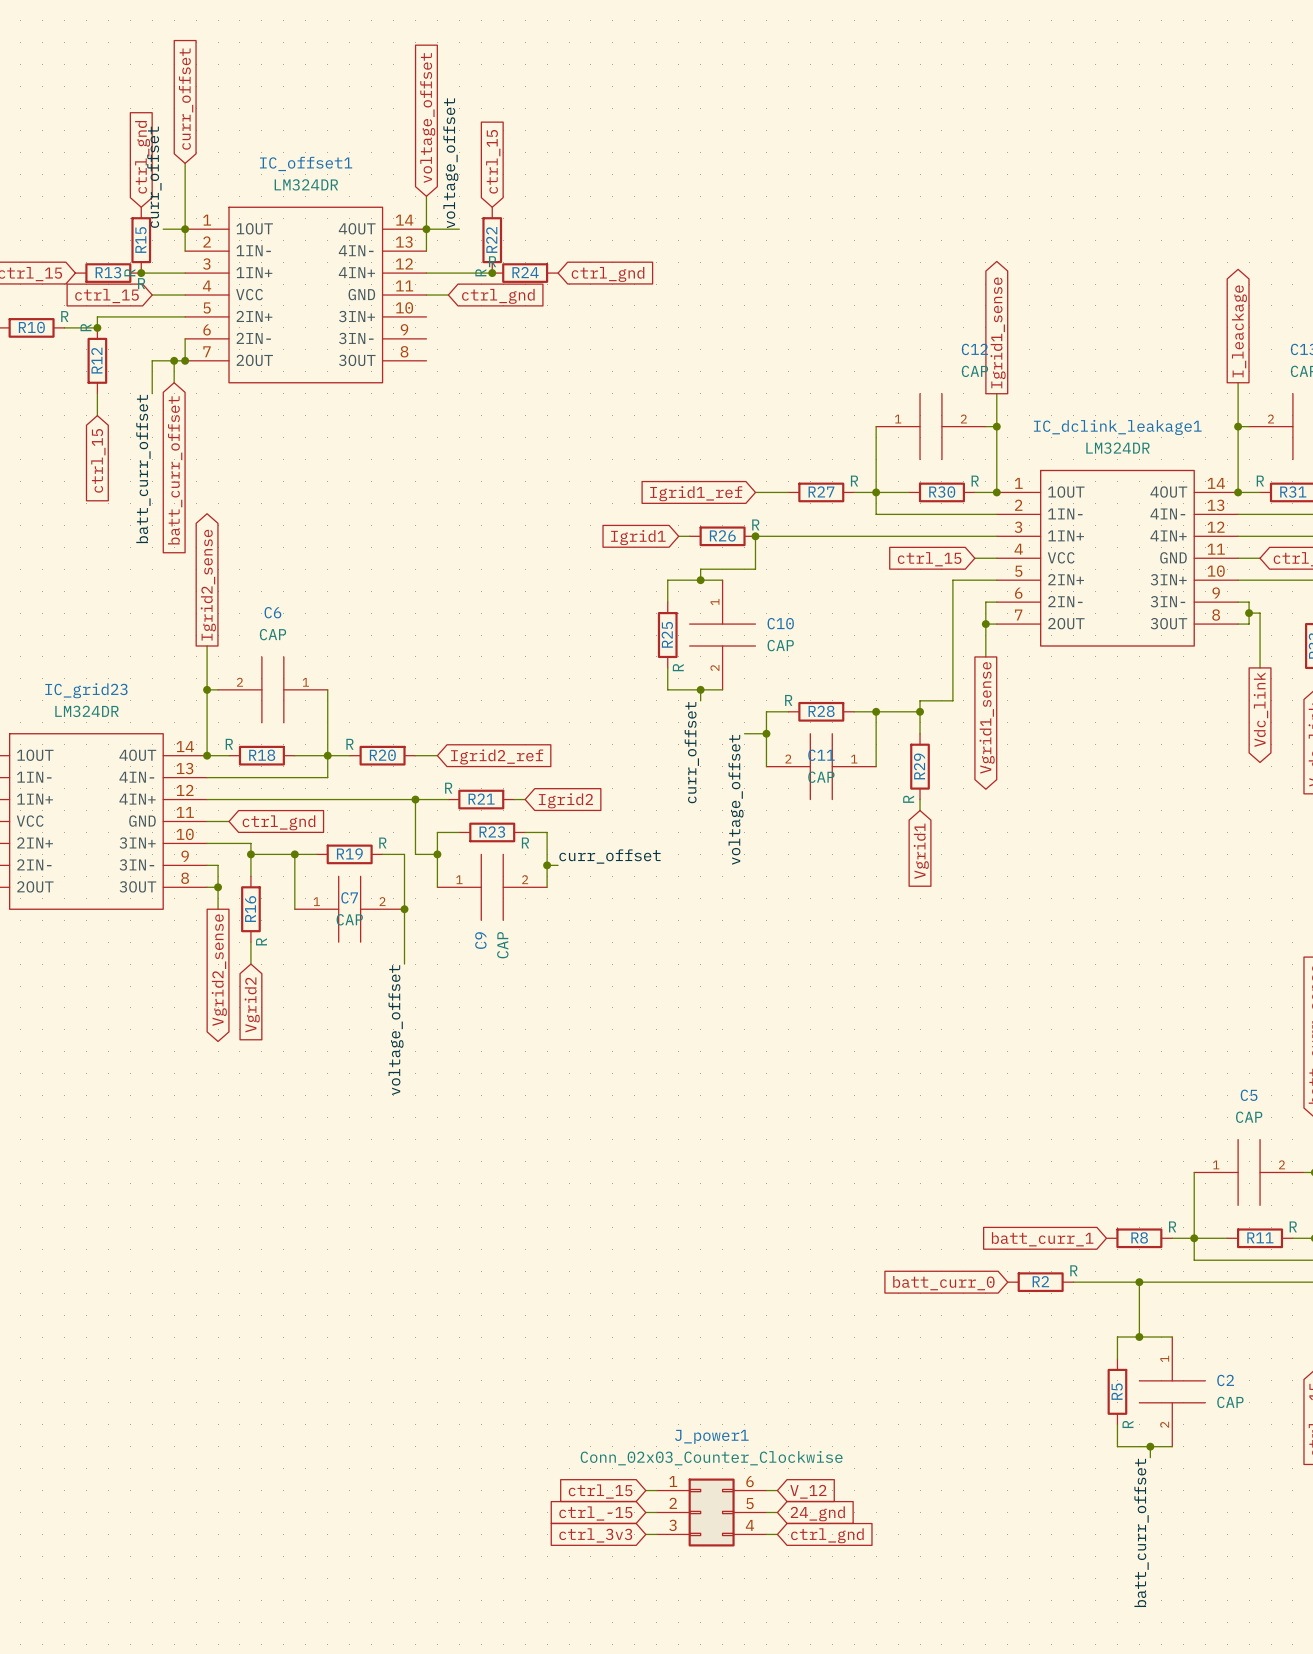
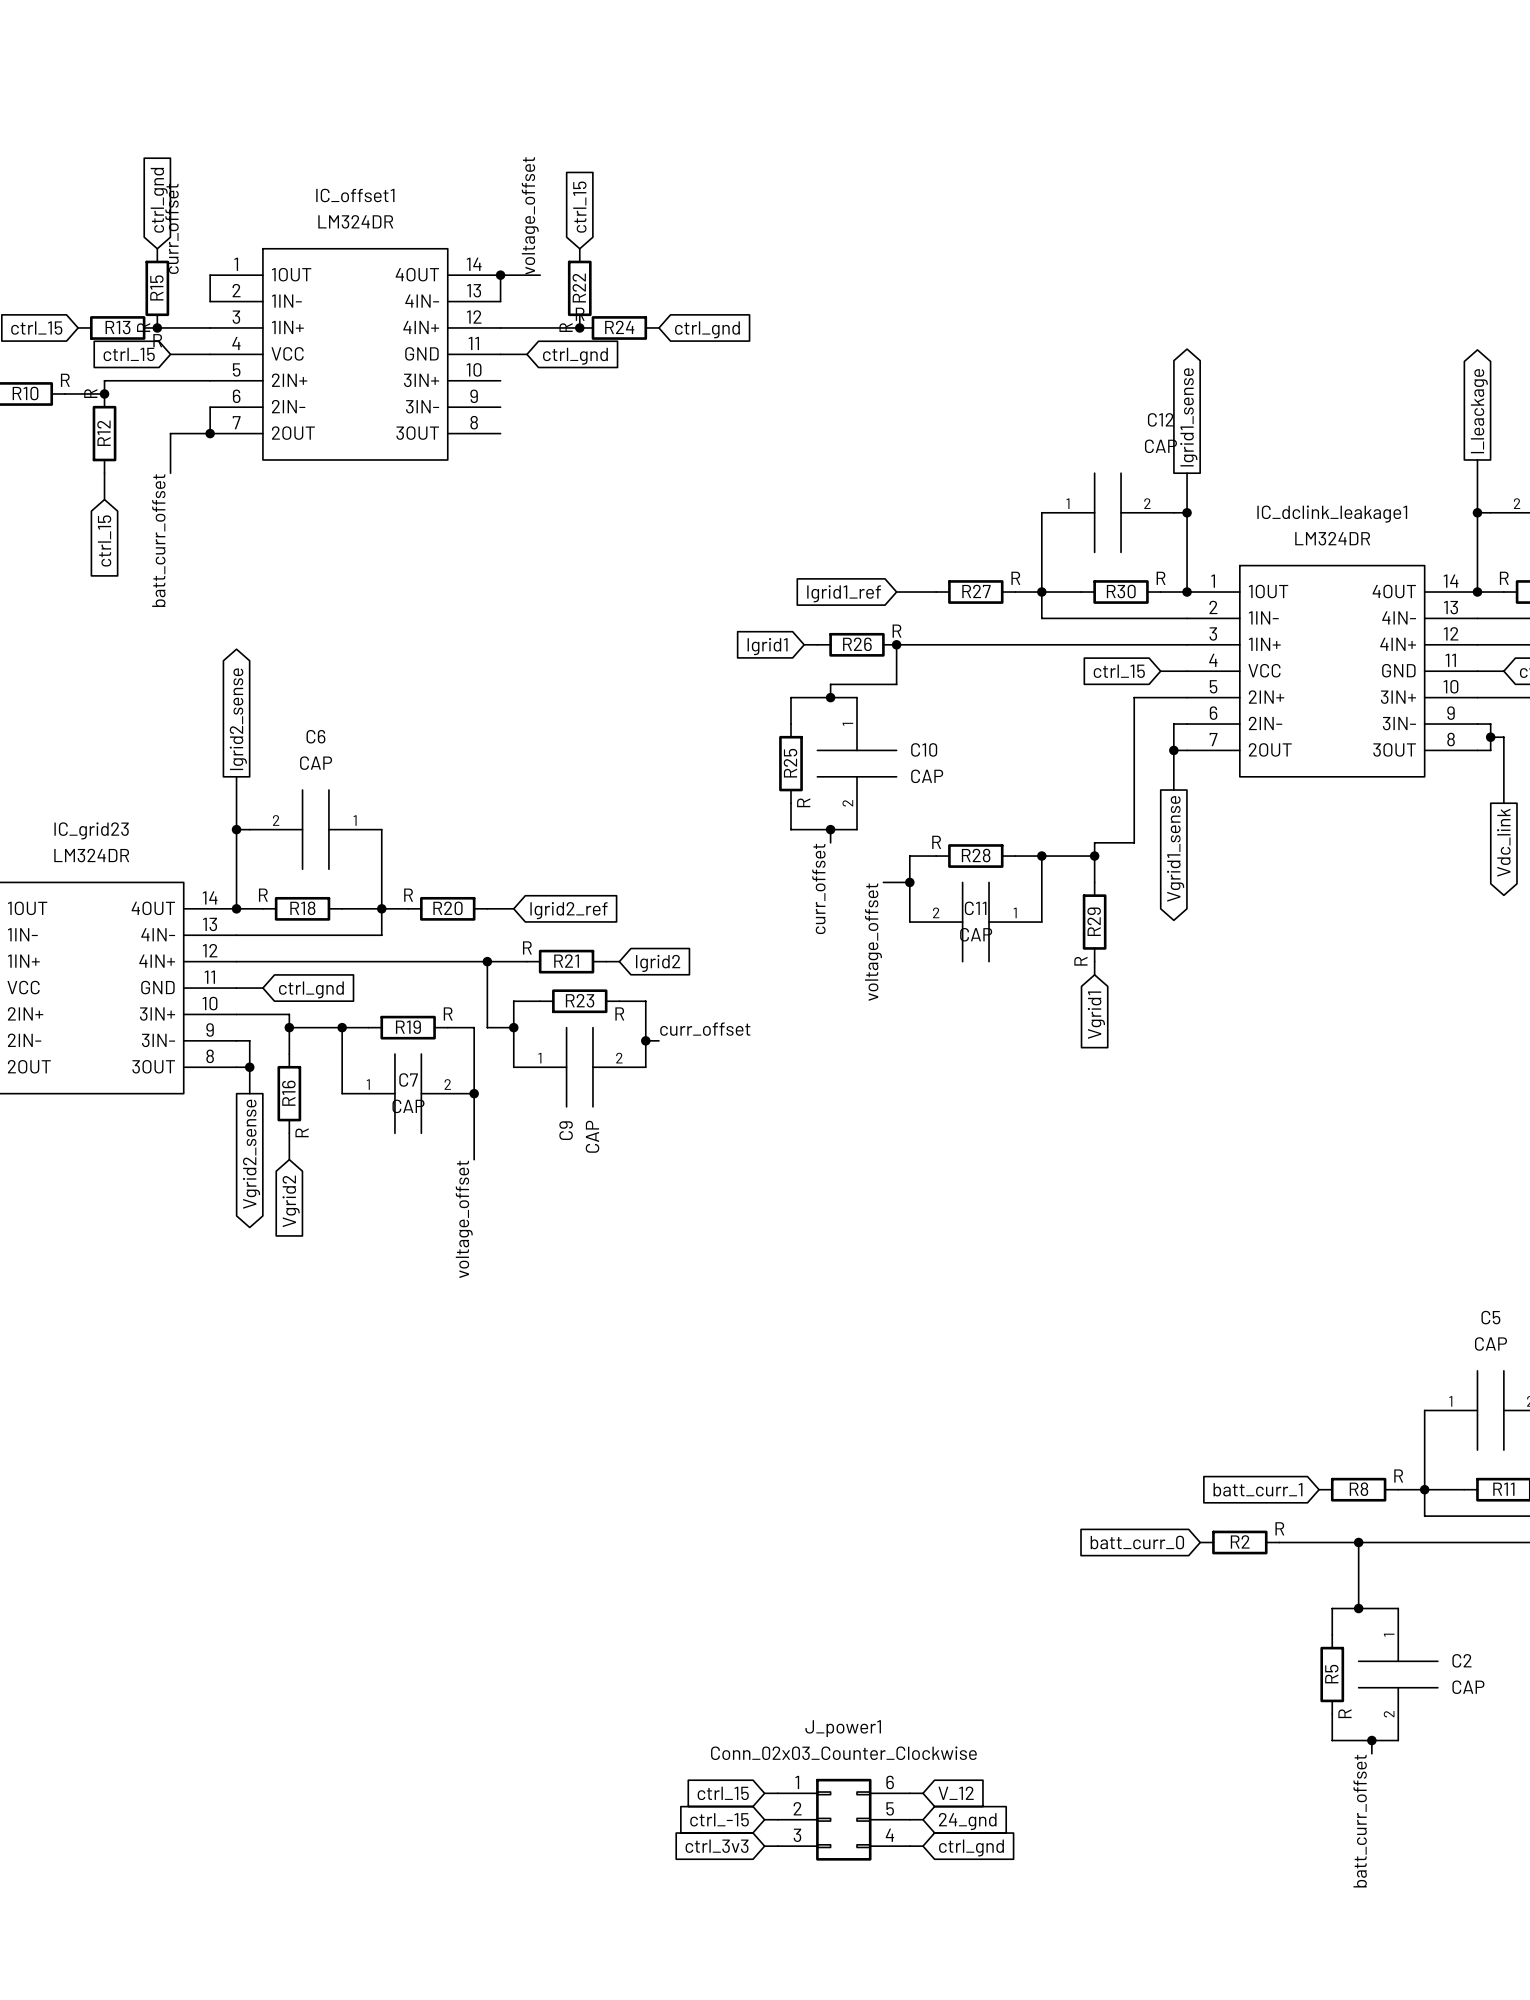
global label: curr_offset (186, 99) -> none
global label: voltage_offset (427, 118) -> none
wire: (185, 163) (185, 229) (163, 229) -> none
wire: (426, 196) (426, 229) -> none
junction: (185, 229) -> none
wire: (174, 360) (174, 382) -> none
junction: (174, 360) -> none
global label: batt_curr_offset (175, 470) -> none

